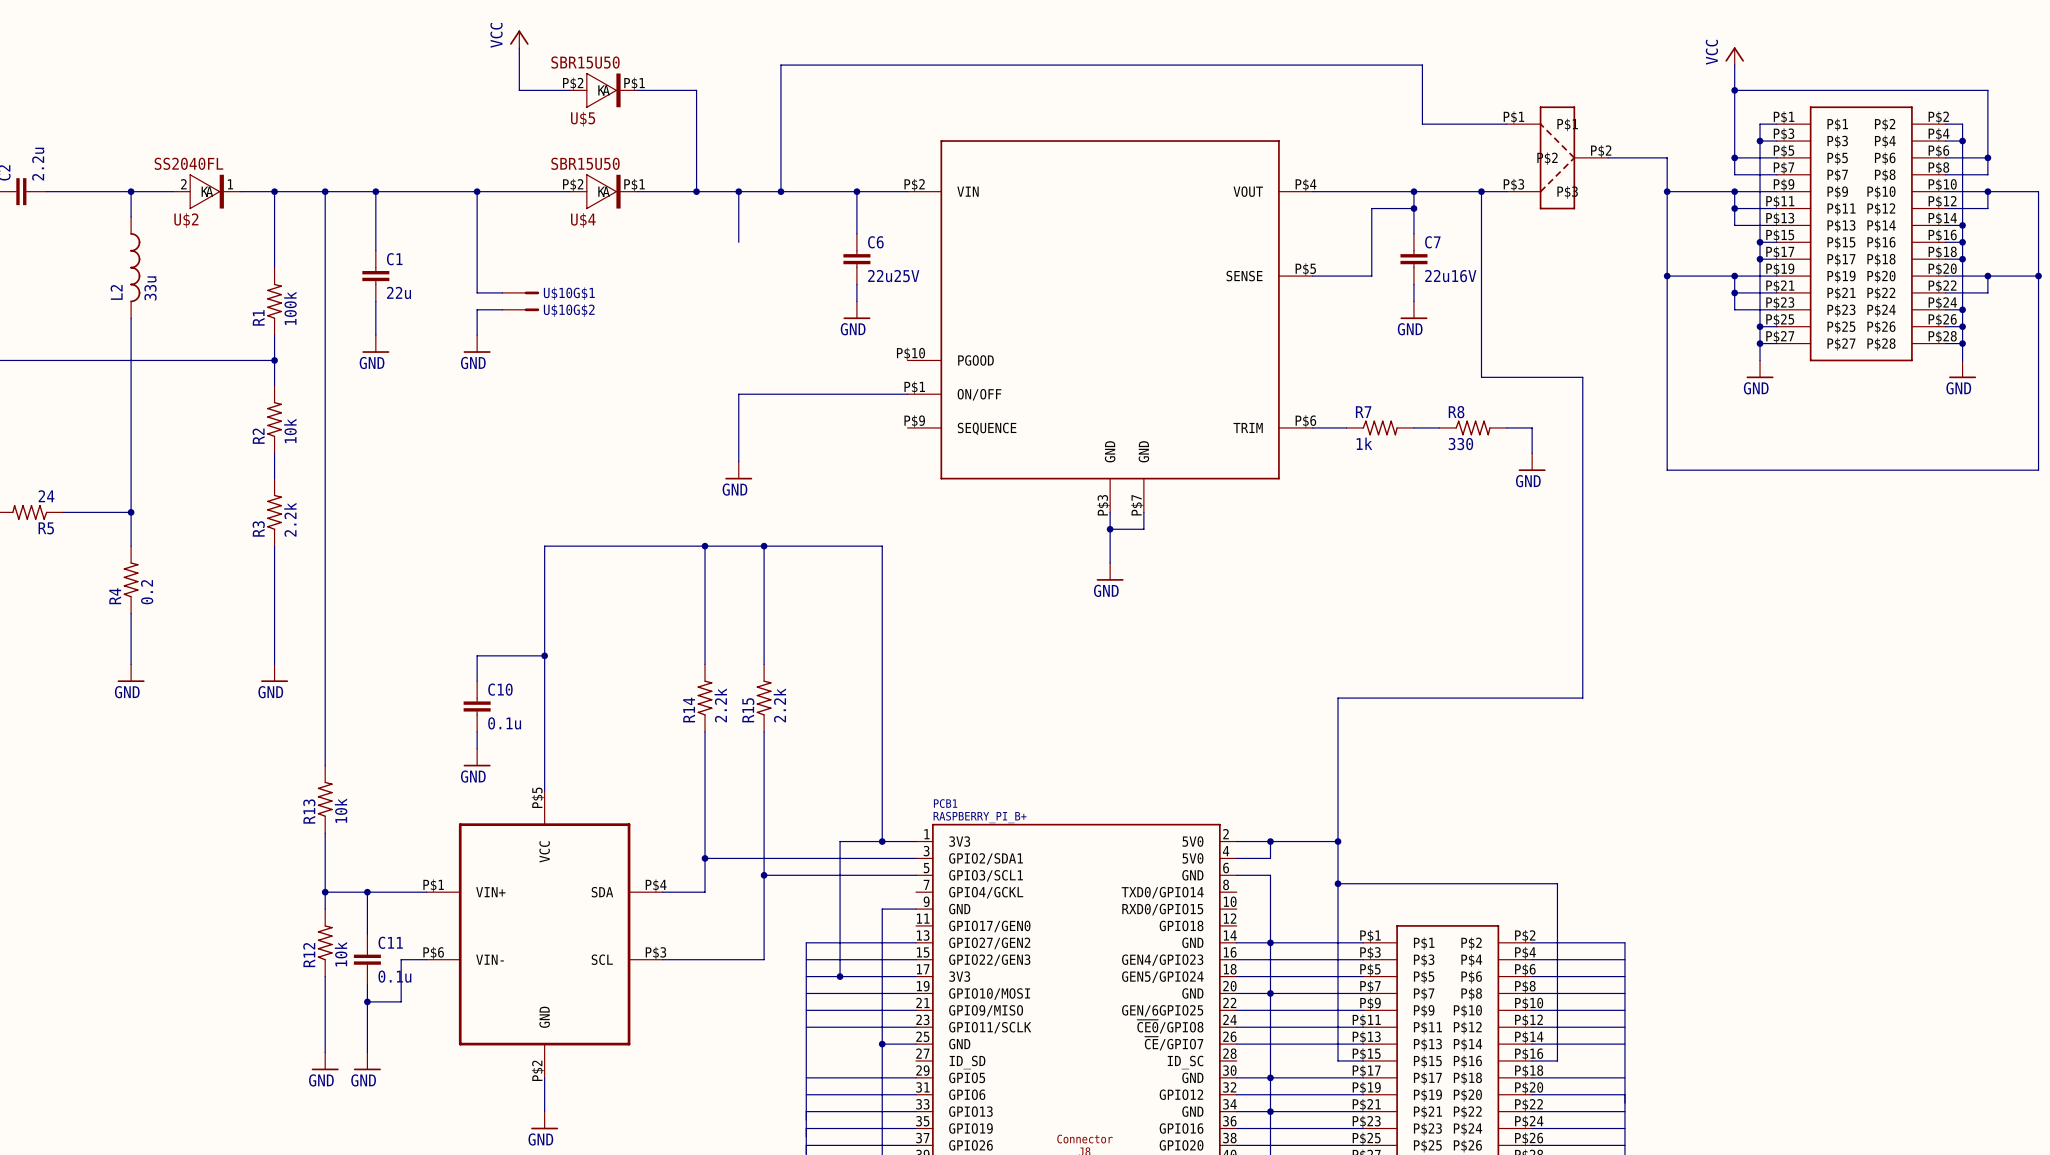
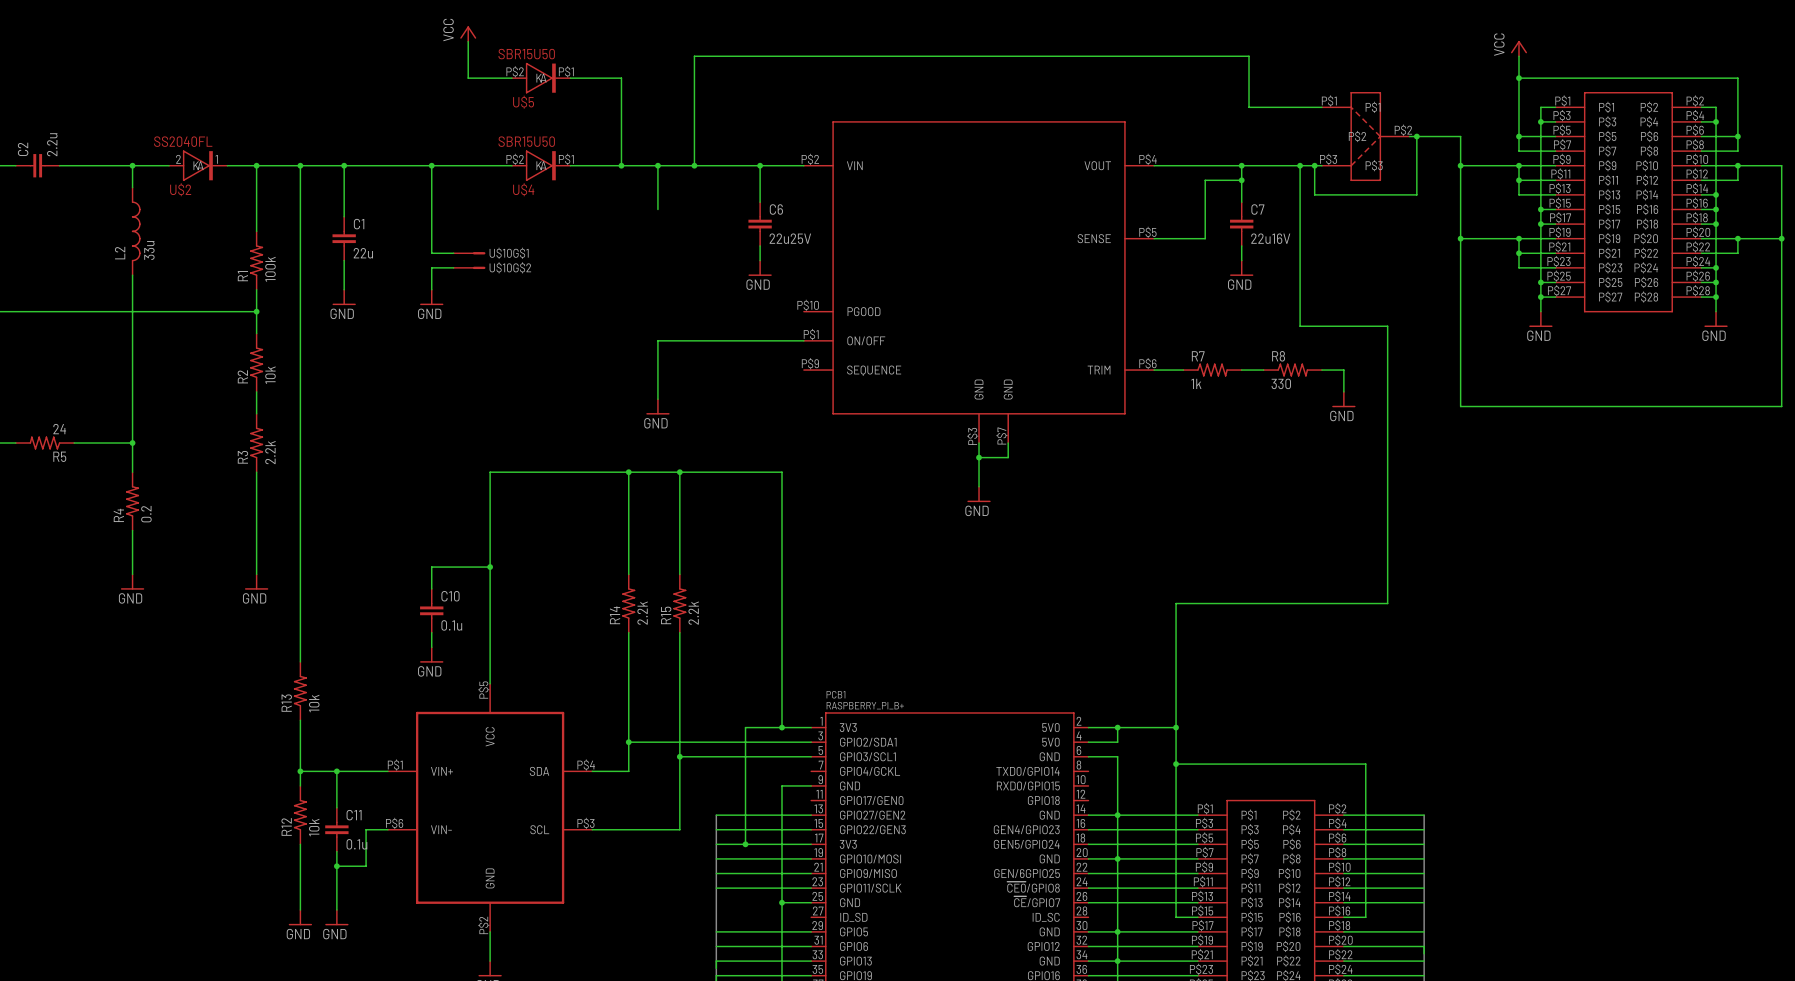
wire: none -> (1416, 136) (1416, 194) (1314, 194) (1314, 165)
junction: none -> (1416, 136)
junction: none -> (1314, 165)

